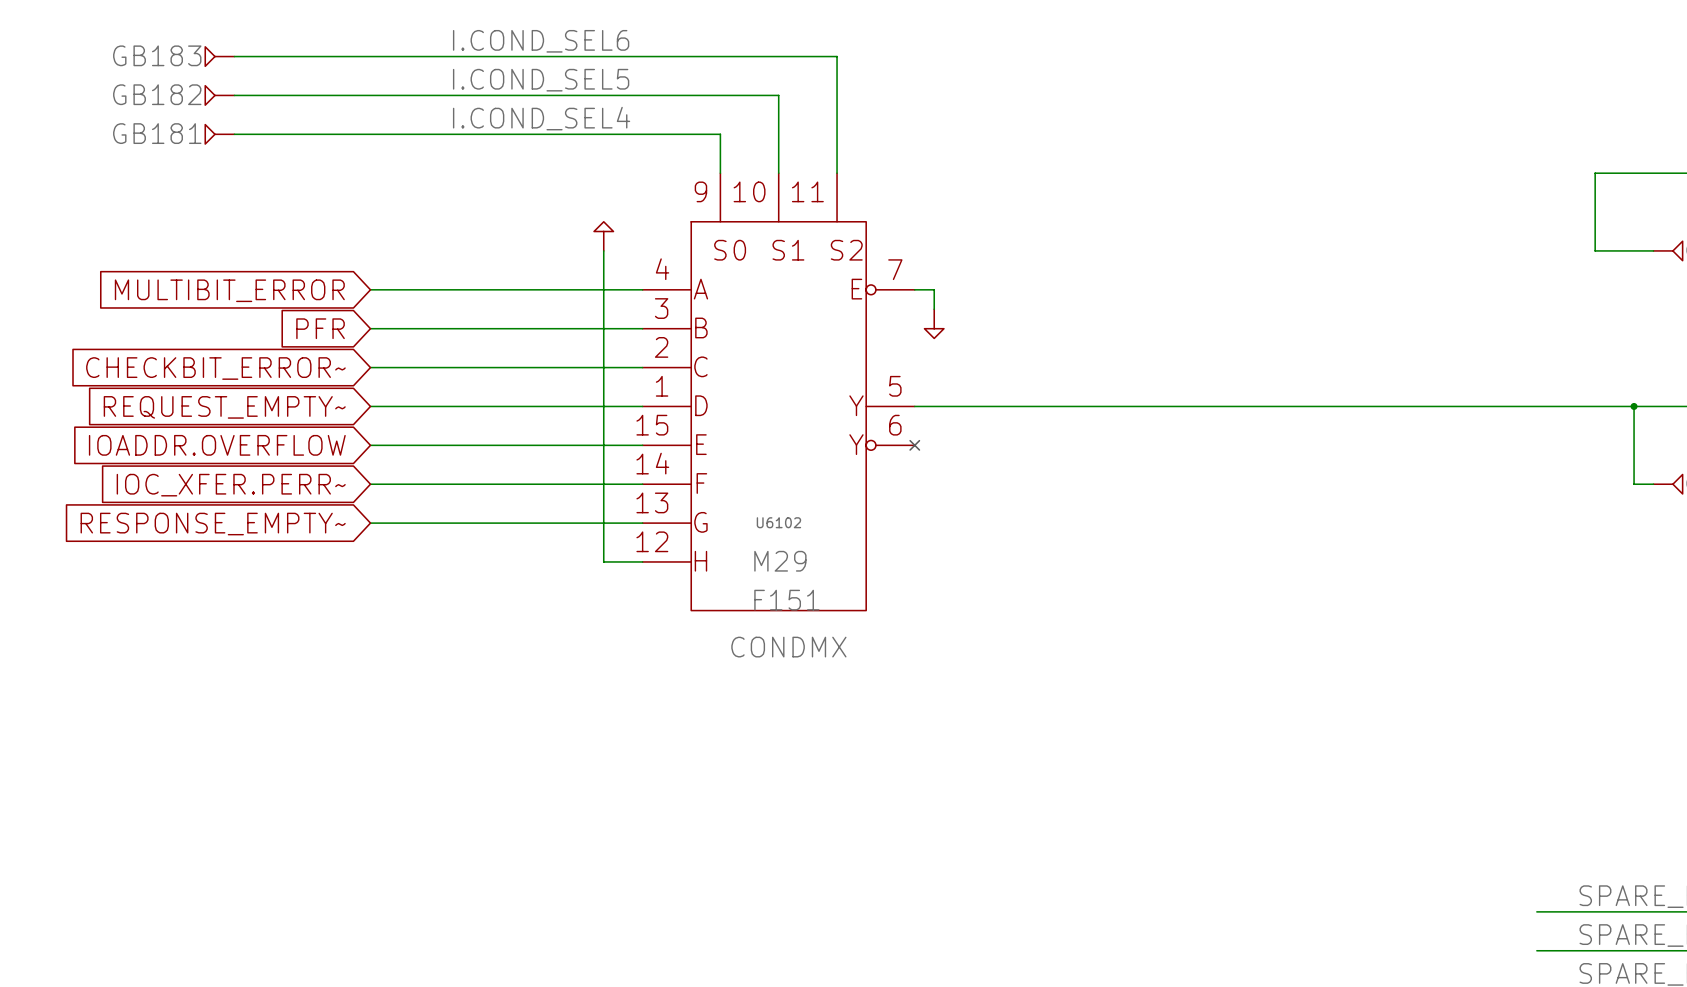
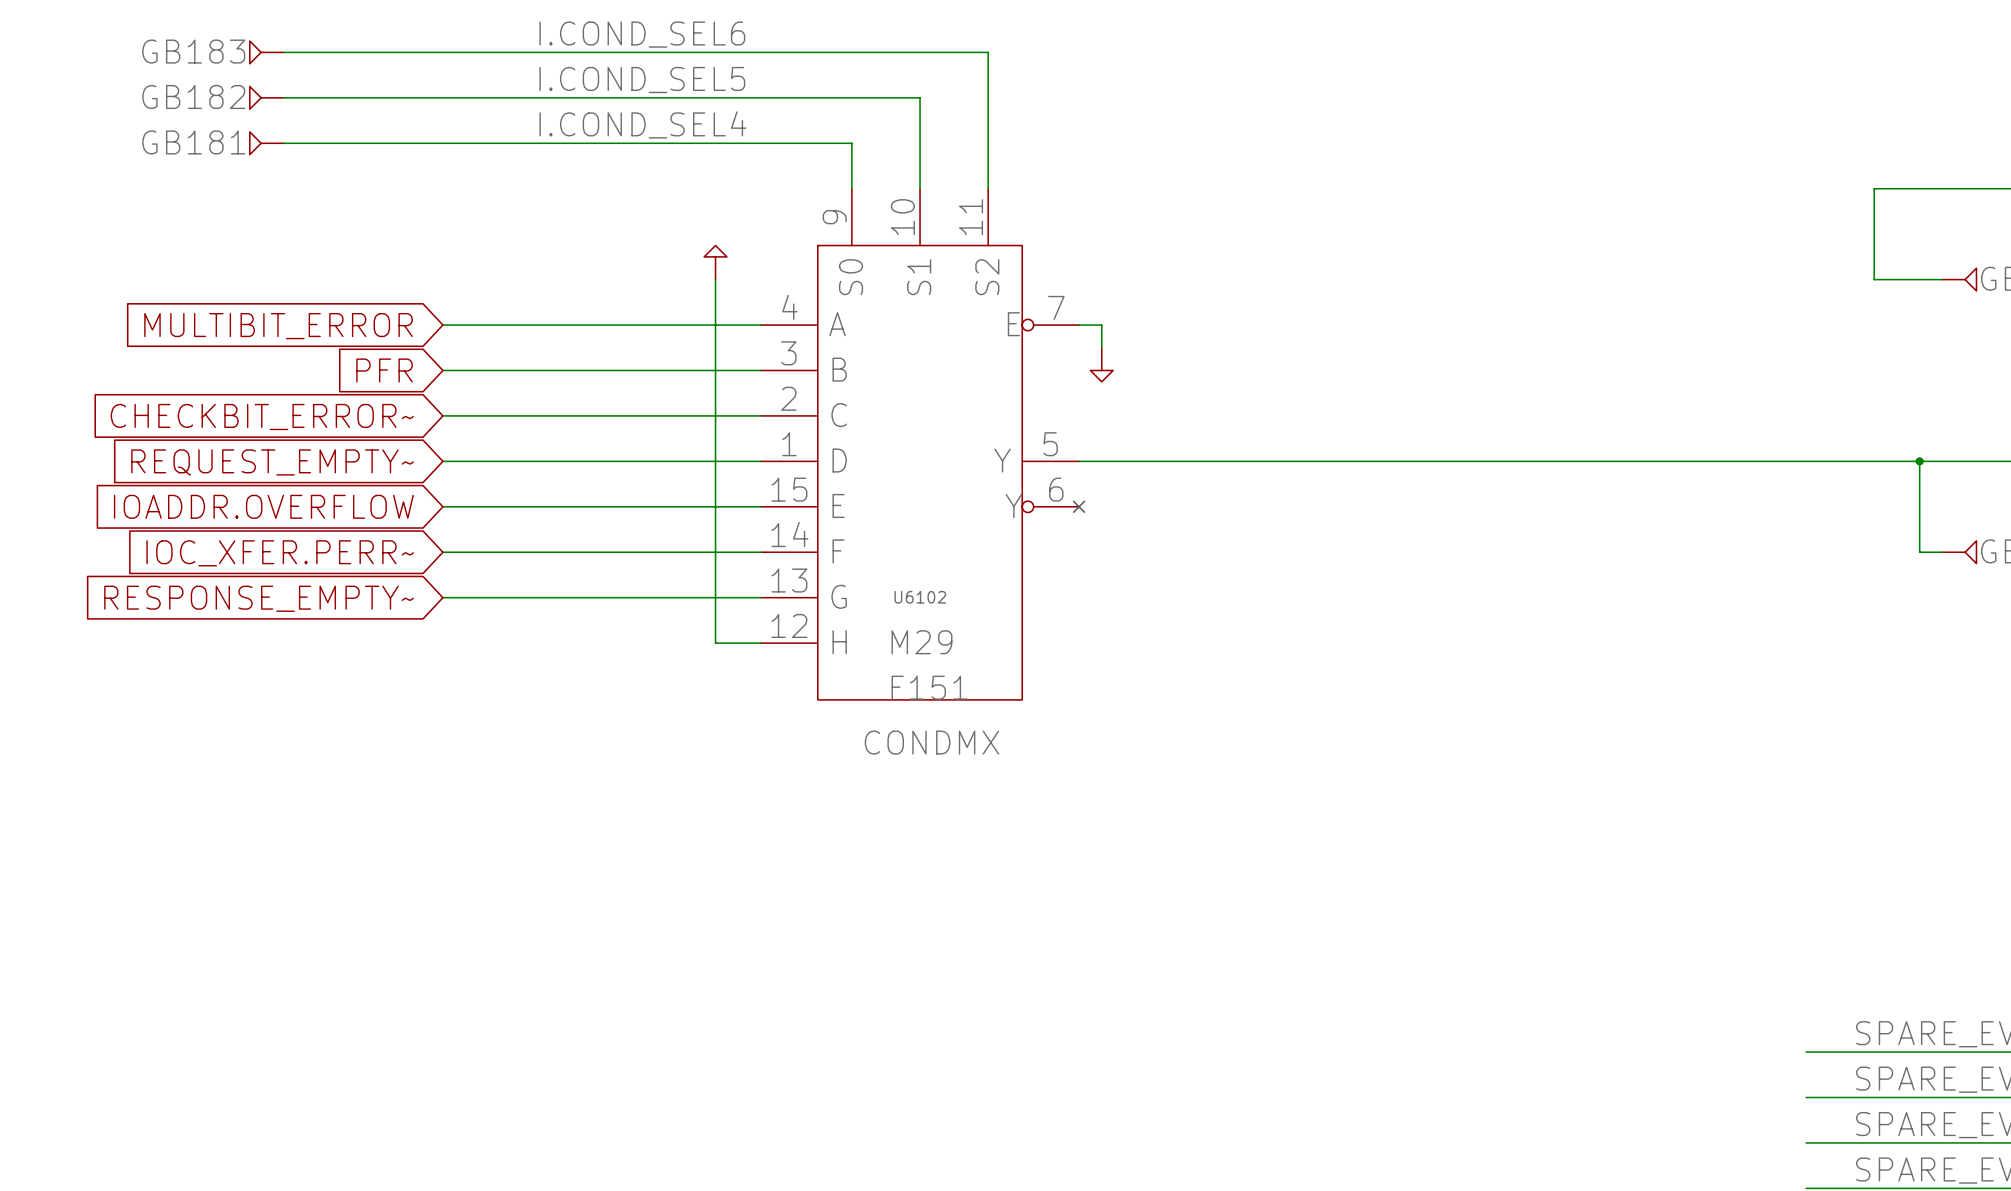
U6102 symbol: [642, 173, 915, 611] -> [760, 188, 1080, 700]

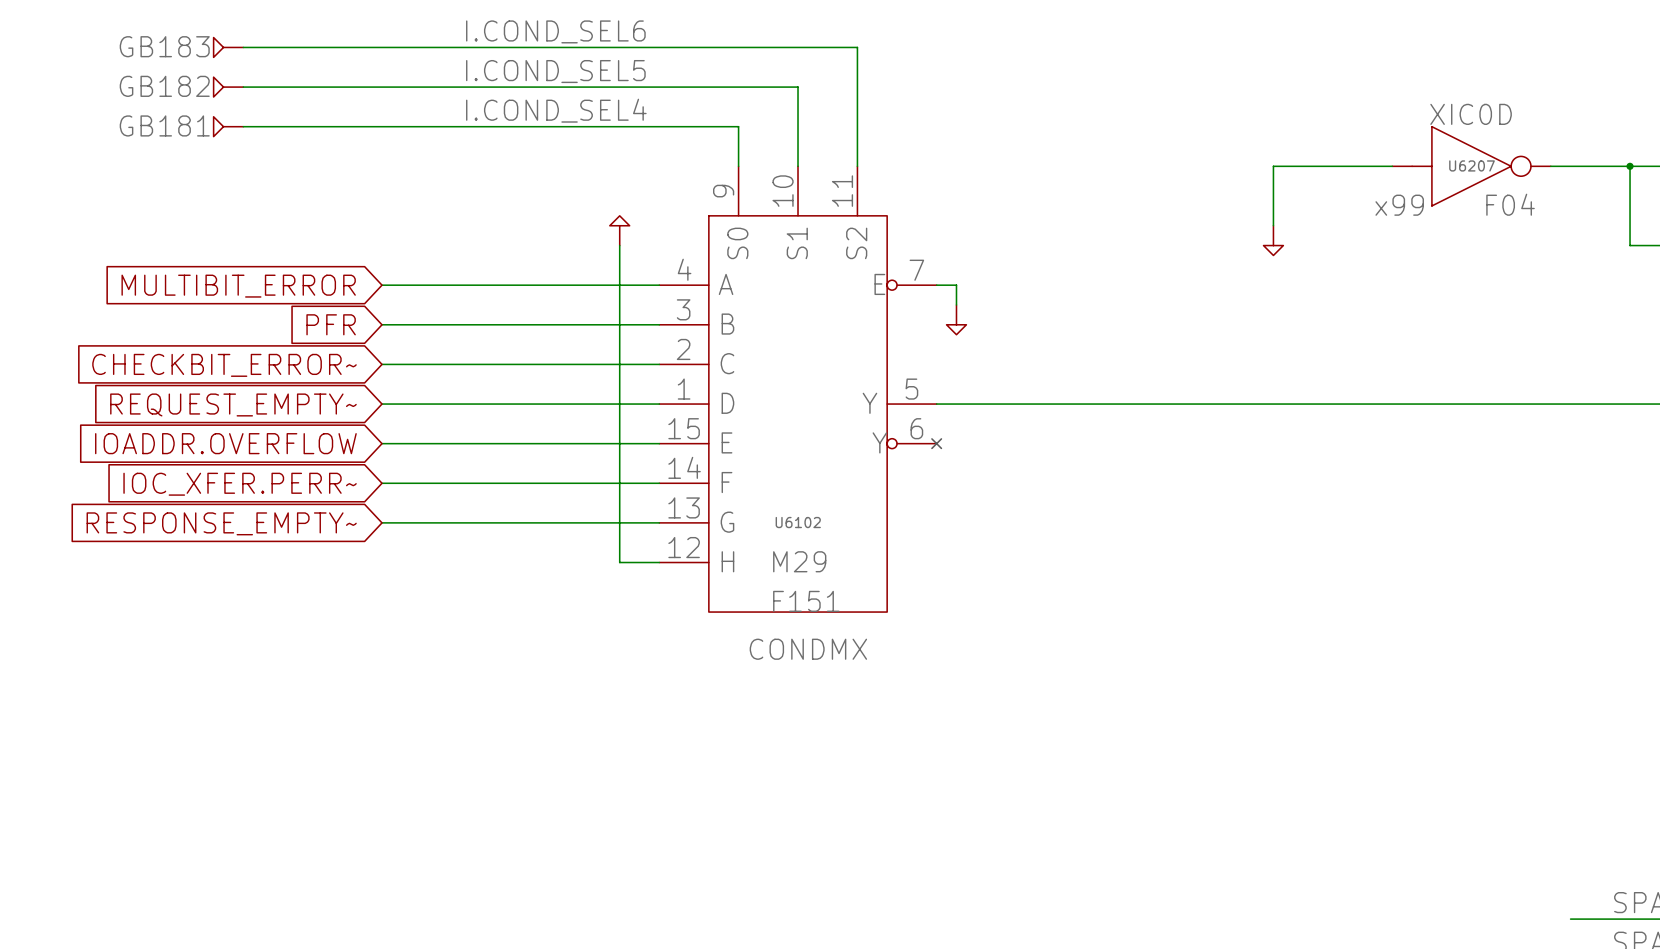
wire: none -> (1392, 166) (1273, 166) (1273, 225)
U6207: none -> F04 (1471, 166)
wire: none -> (1550, 166) (1630, 166)
junction: none -> (1630, 166)
power symbol: none -> (1273, 240)

